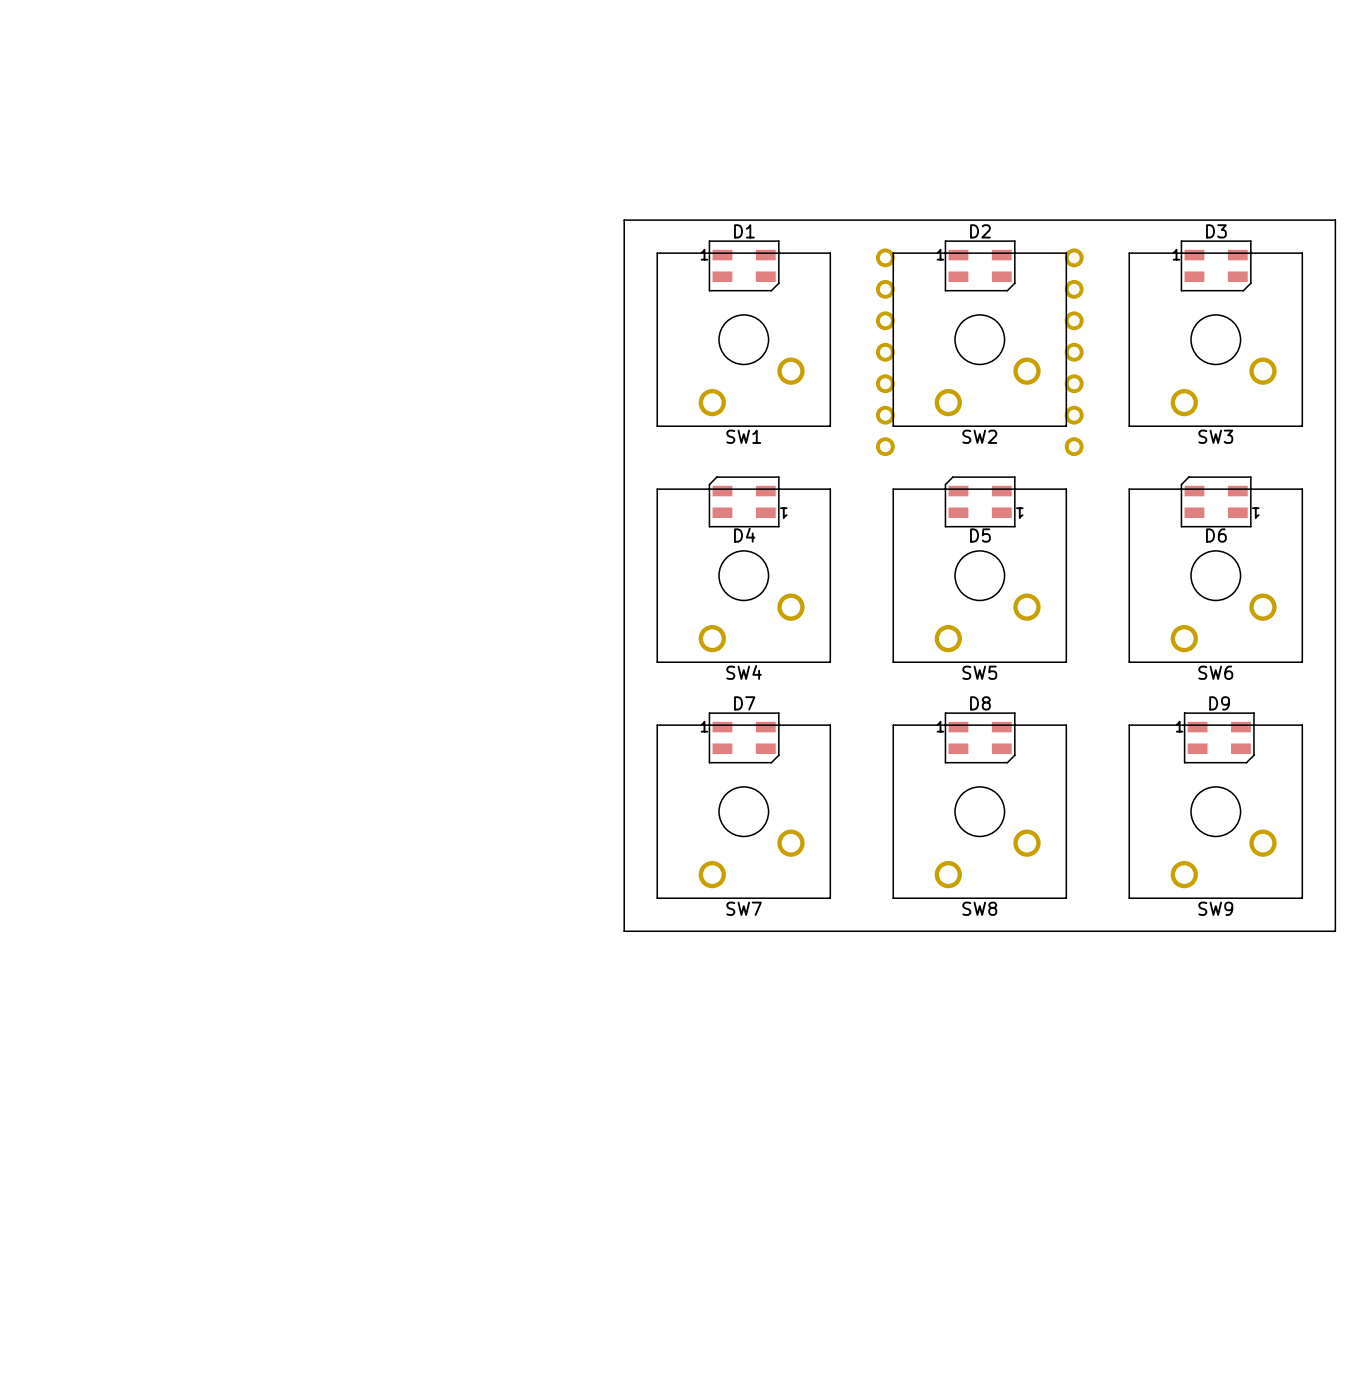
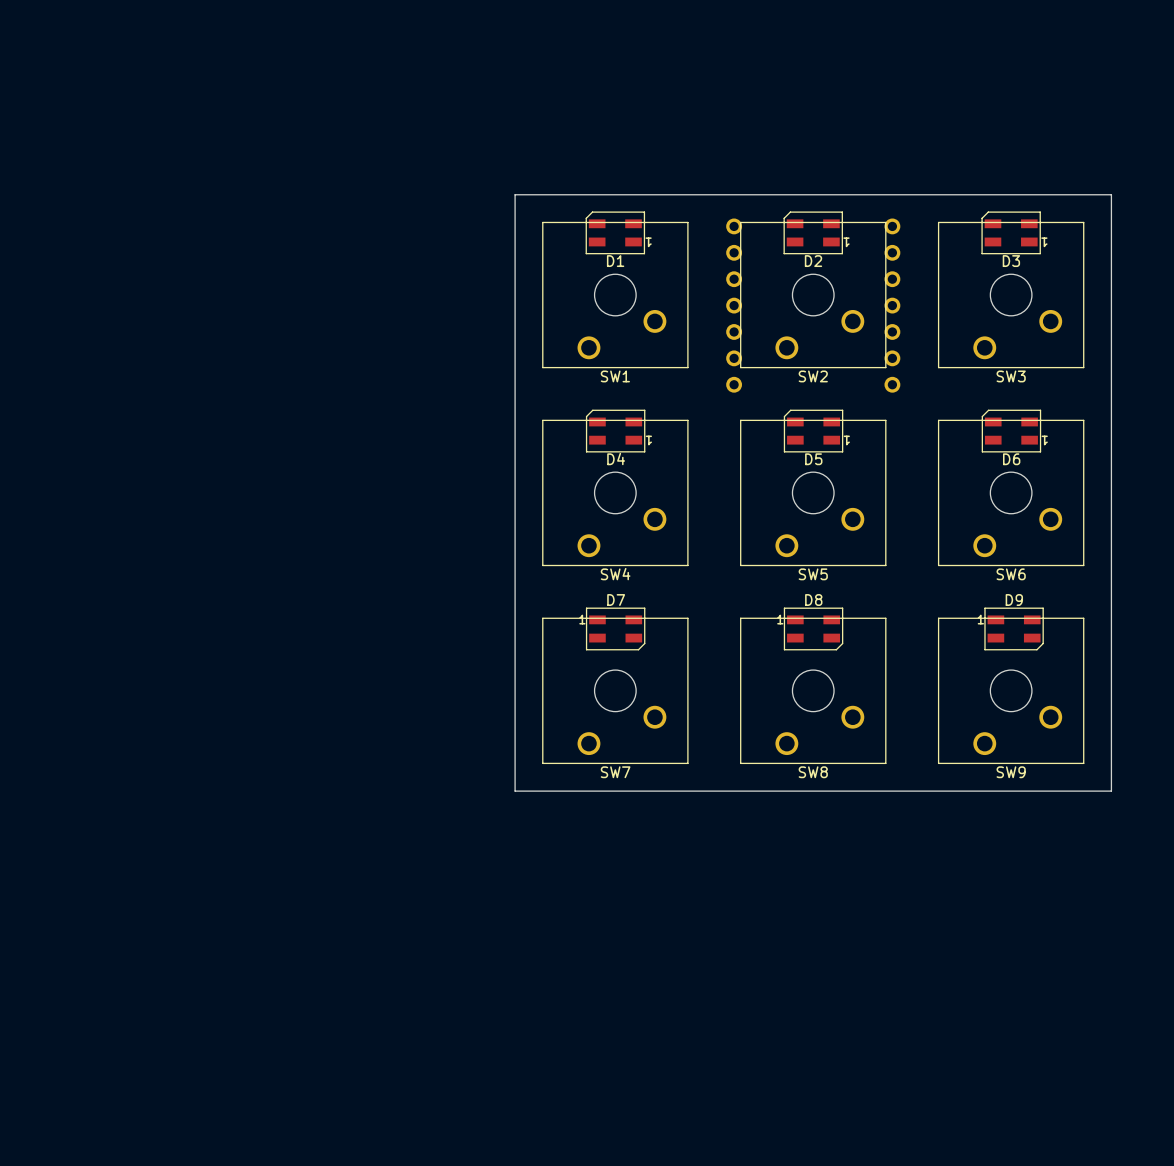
D1 rotation: 0° (744, 265) -> 180° (615, 232)
D2 rotation: 0° (980, 265) -> 180° (813, 232)
D3 rotation: 0° (1216, 265) -> 180° (1011, 232)

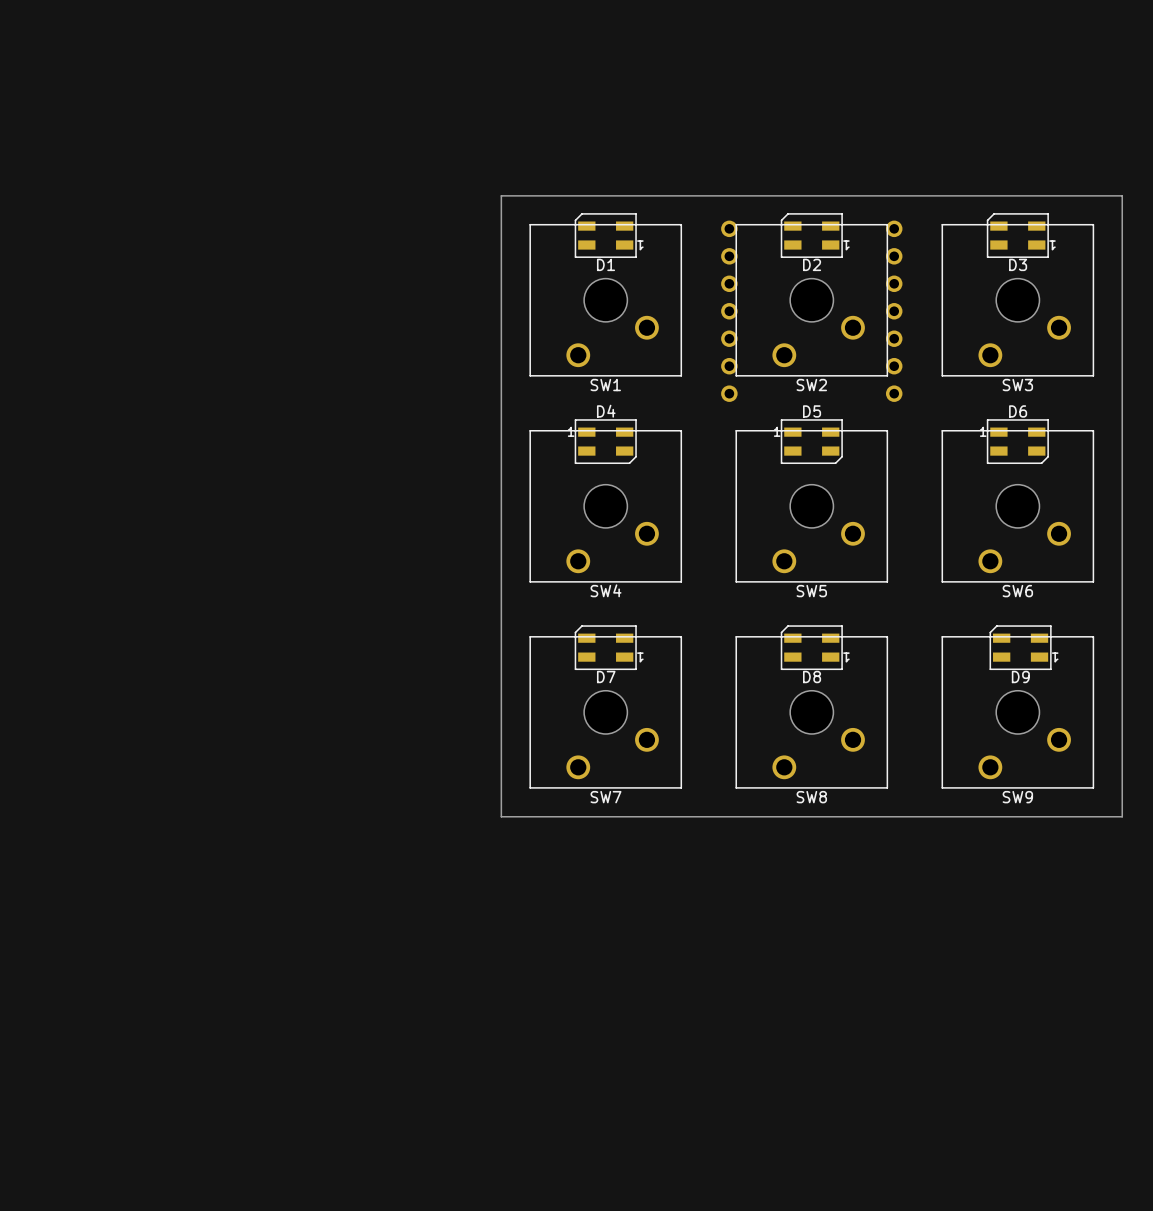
D4 rotation: 0° (615, 431) -> 180° (605, 441)
D5 rotation: 0° (813, 431) -> 180° (811, 441)
D6 rotation: 0° (1011, 431) -> 180° (1017, 441)
D7 rotation: 0° (615, 628) -> 180° (605, 647)
D8 rotation: 0° (813, 628) -> 180° (811, 647)
D9 rotation: 0° (1014, 628) -> 180° (1020, 647)

